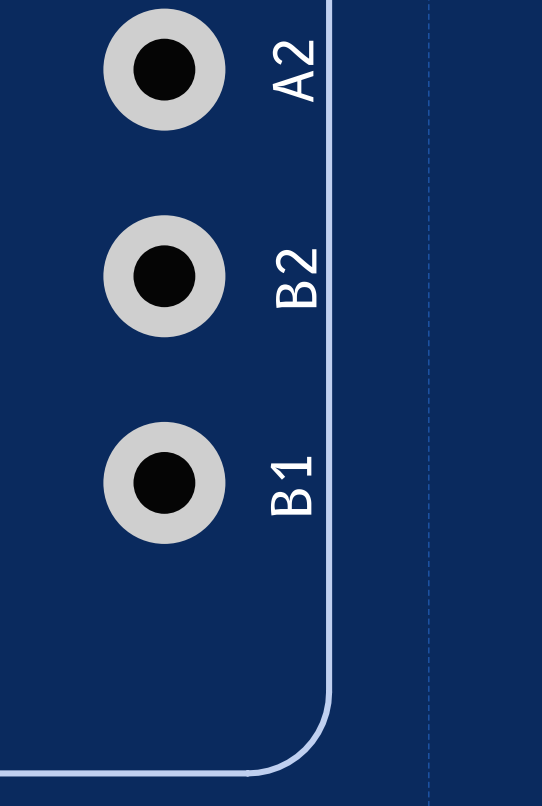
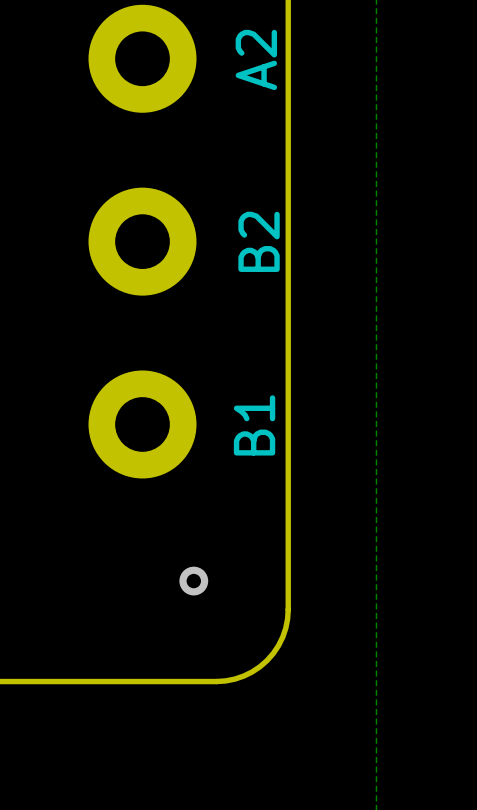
via: none -> (193, 581)

